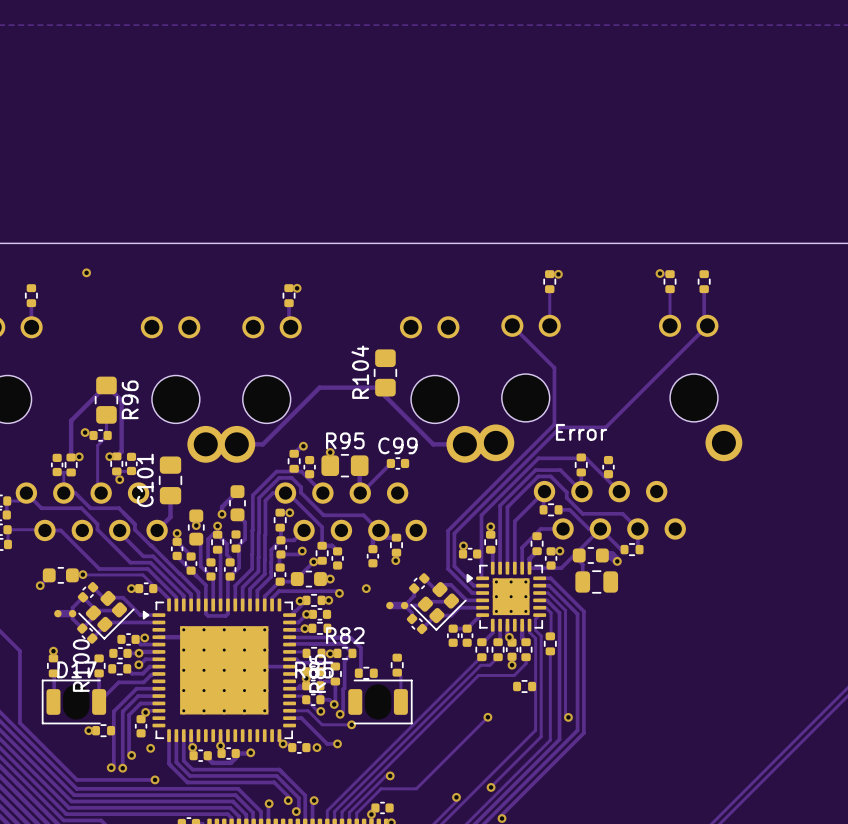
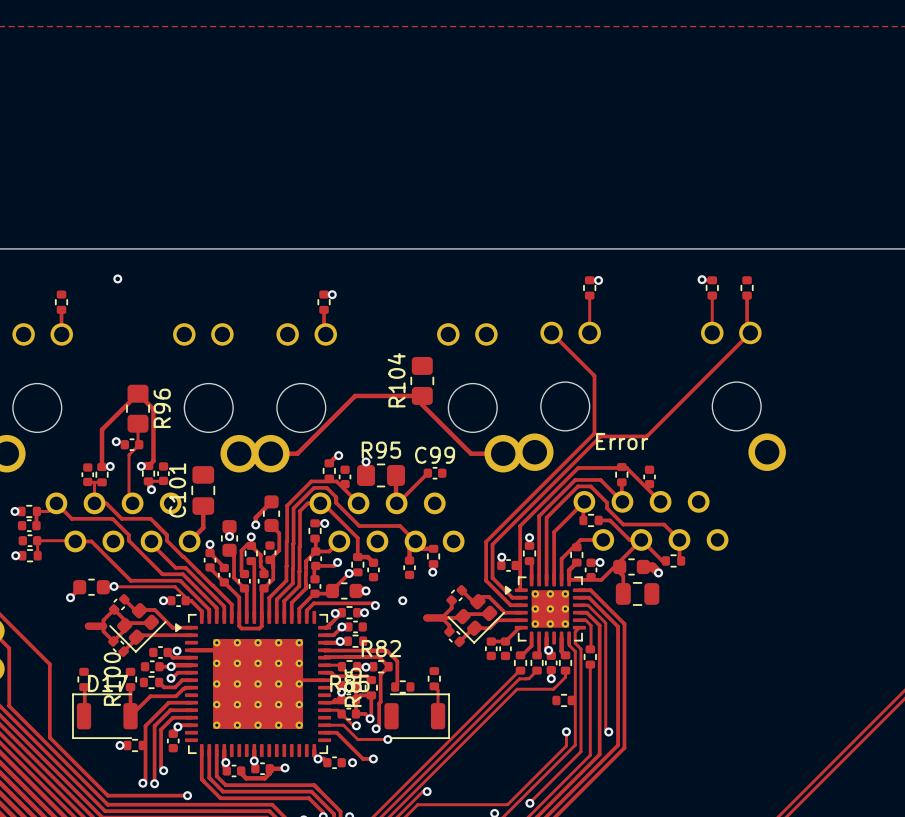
via: (53, 651) -> none
track: (487, 717) (416, 788) -> (566, 731) (566, 745) (507, 804) (453, 804)
via position: (487, 717) -> (566, 731)
via: (150, 748) -> none

